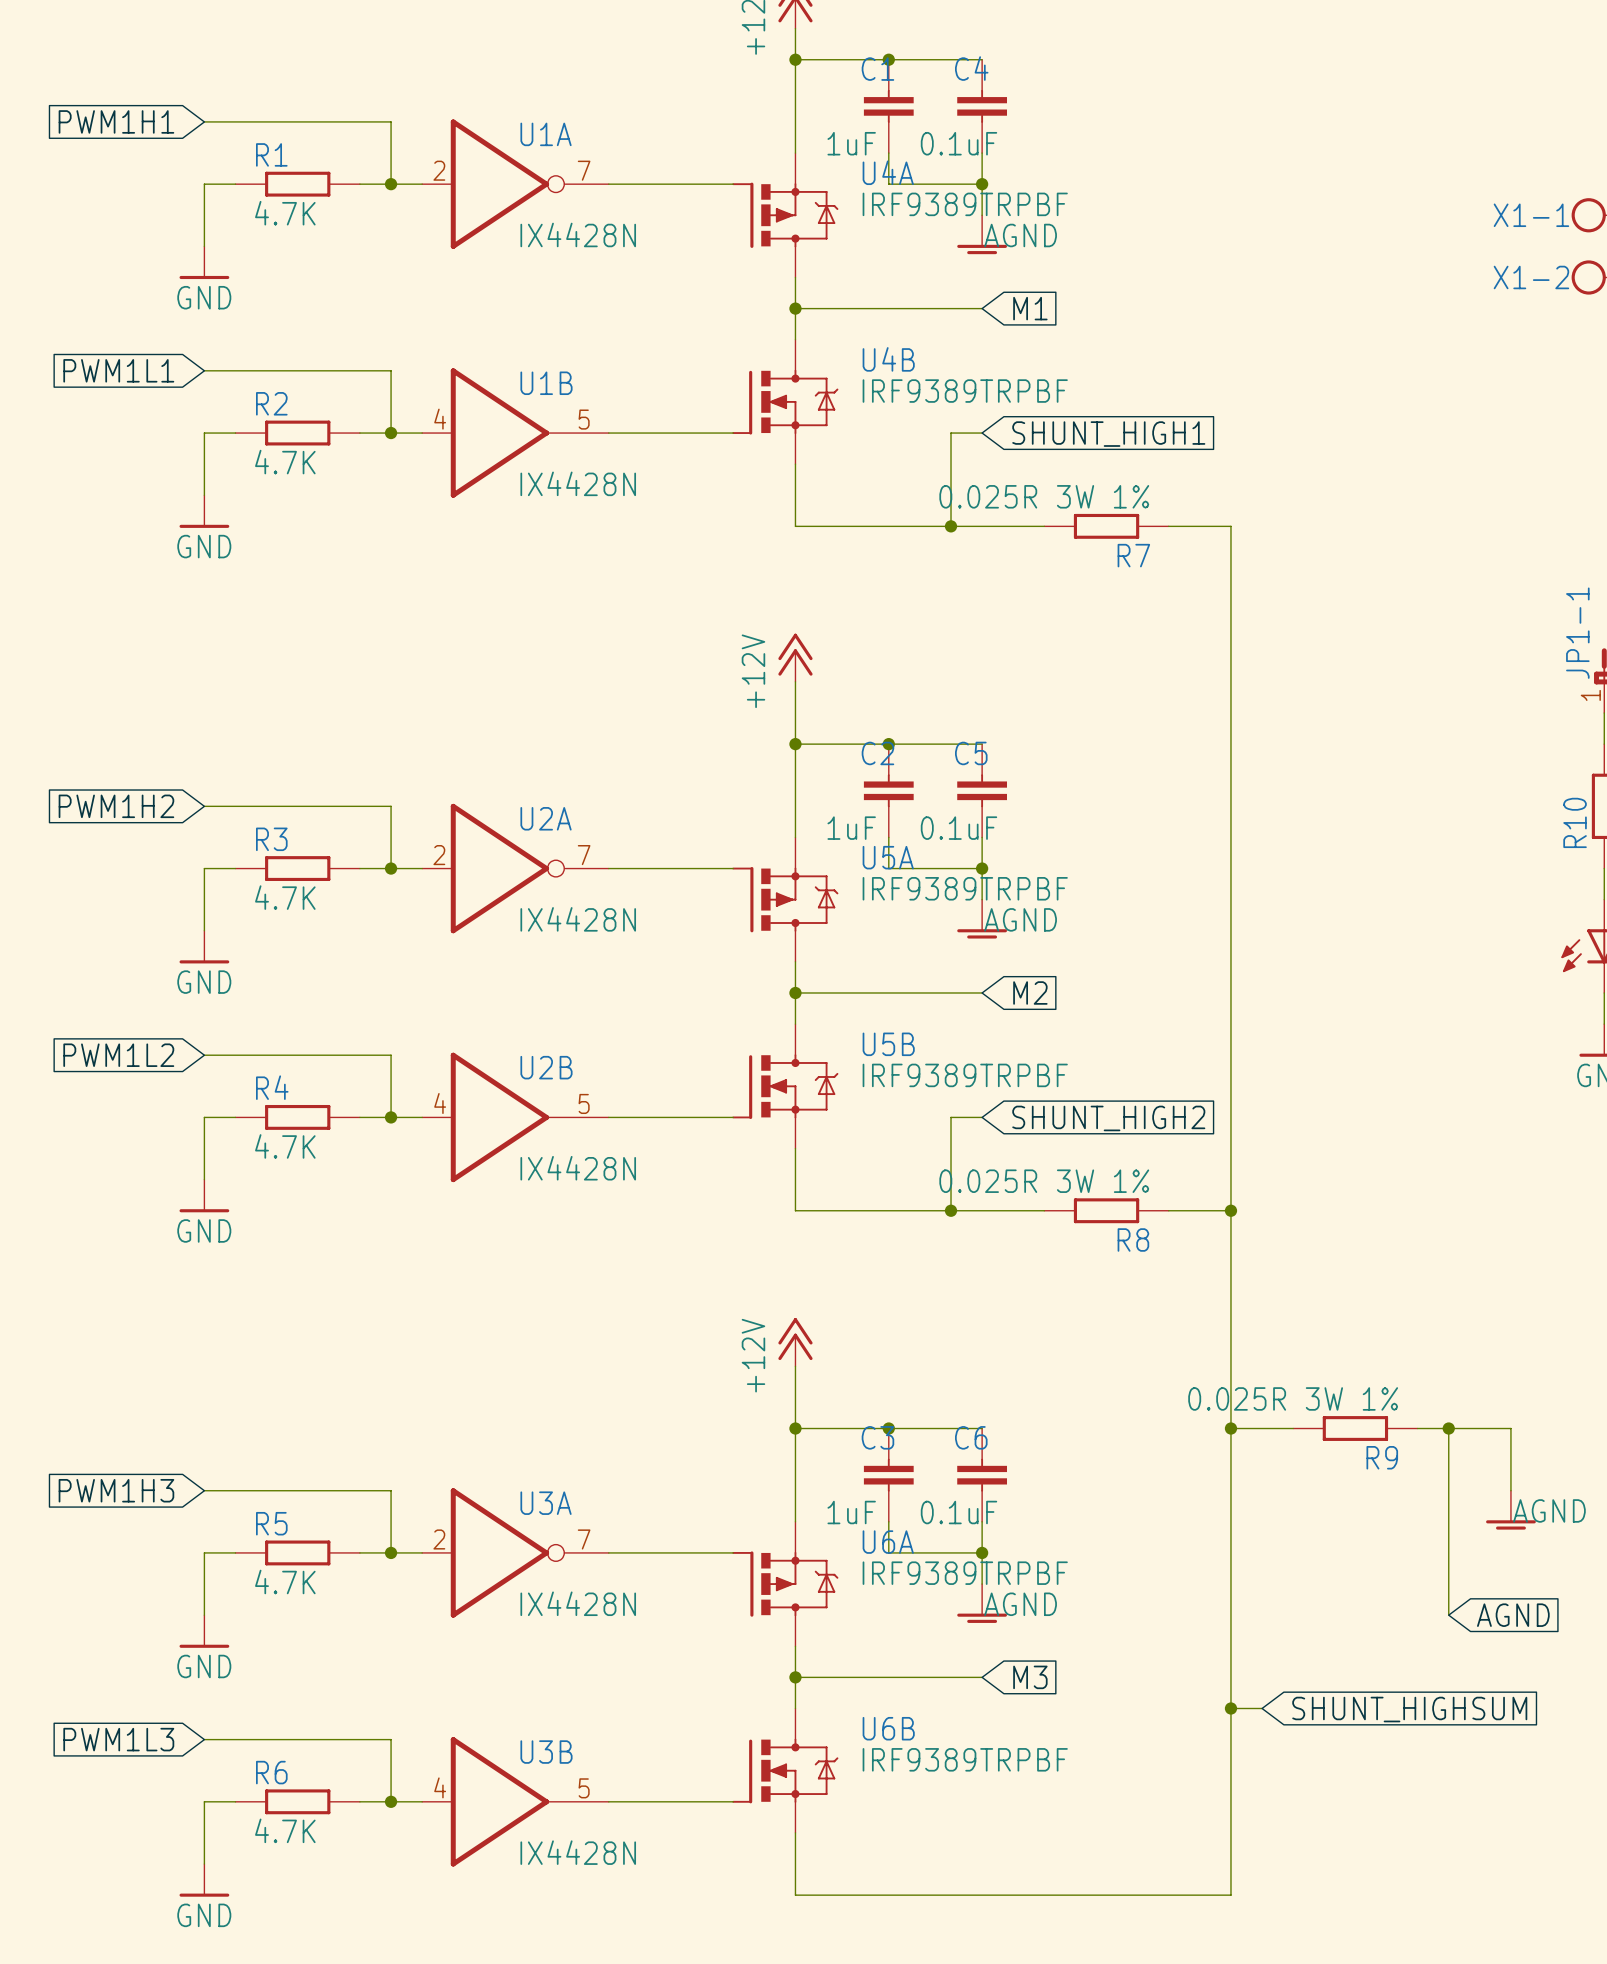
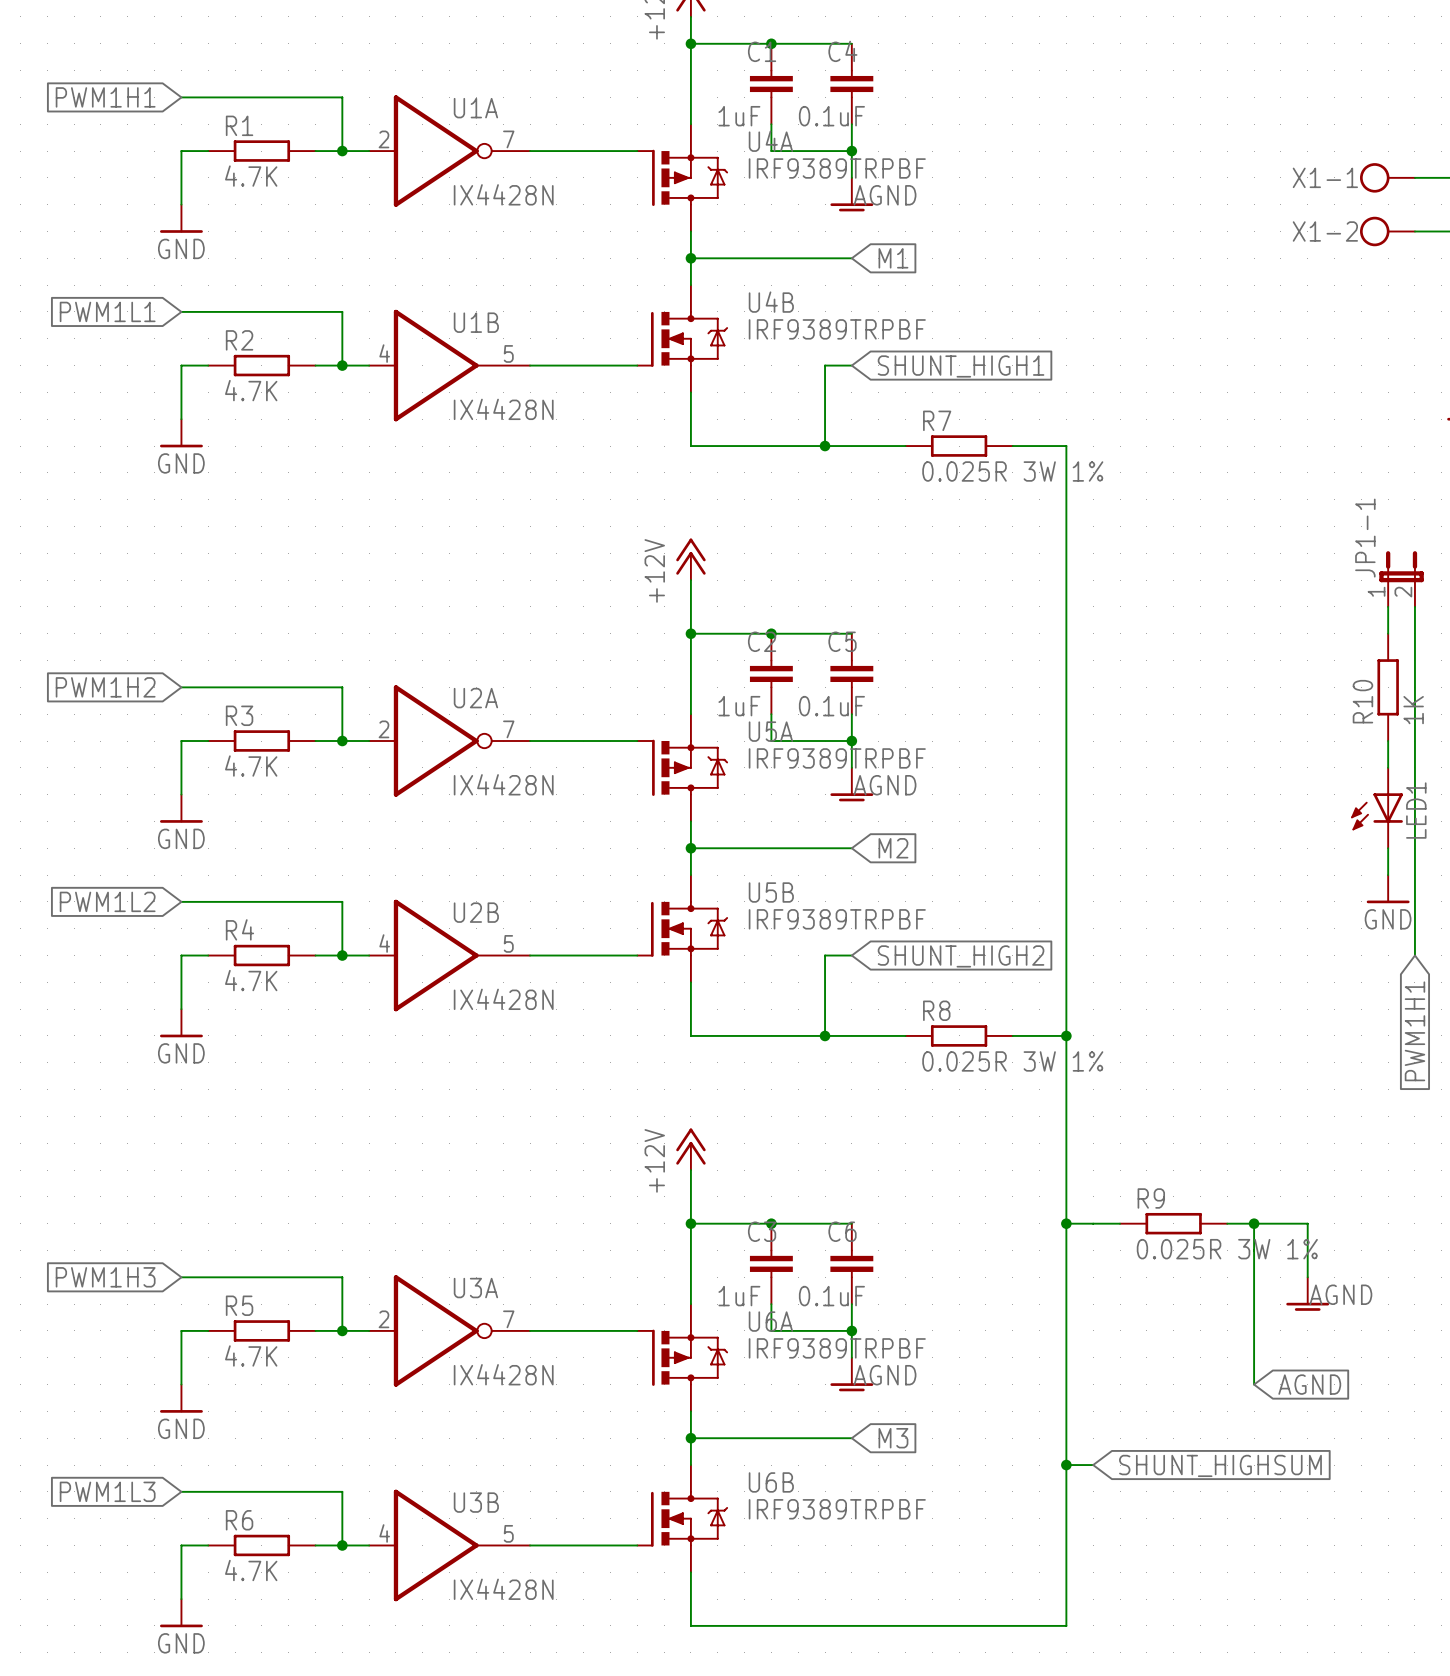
R7 value position: 0.025R 3W 1% (1044, 496) -> 0.025R 3W 1% (1012, 471)
R7 name position: R7 (1133, 555) -> R7 (937, 420)
R8 value position: 0.025R 3W 1% (1044, 1181) -> 0.025R 3W 1% (1012, 1061)
R8 name position: R8 (1133, 1239) -> R8 (936, 1010)
R9 value position: 0.025R 3W 1% (1293, 1398) -> 0.025R 3W 1% (1227, 1249)
R9 name position: R9 (1382, 1457) -> R9 (1151, 1198)

